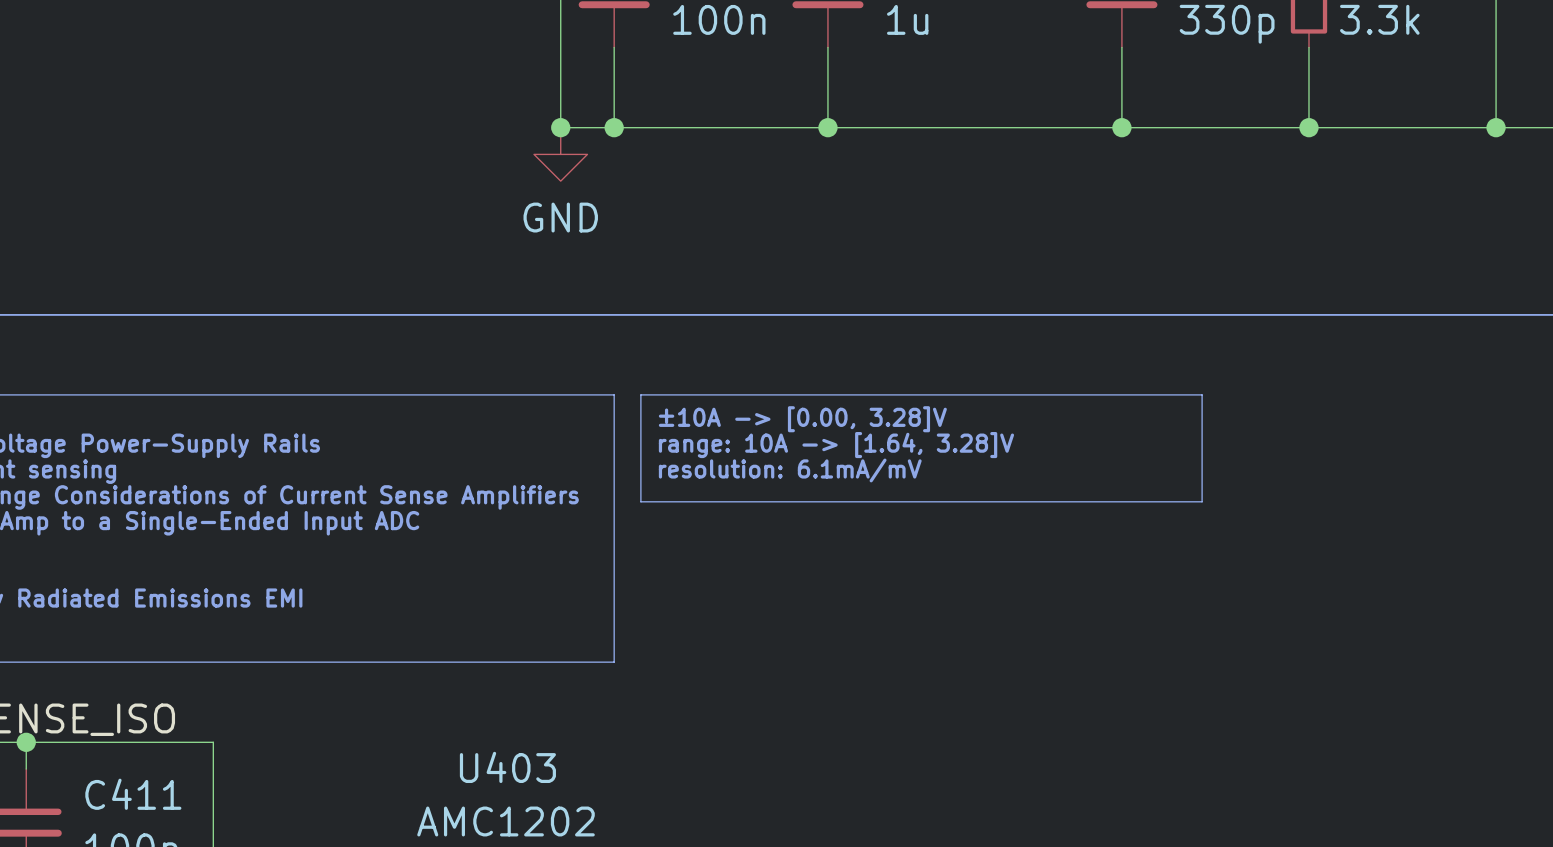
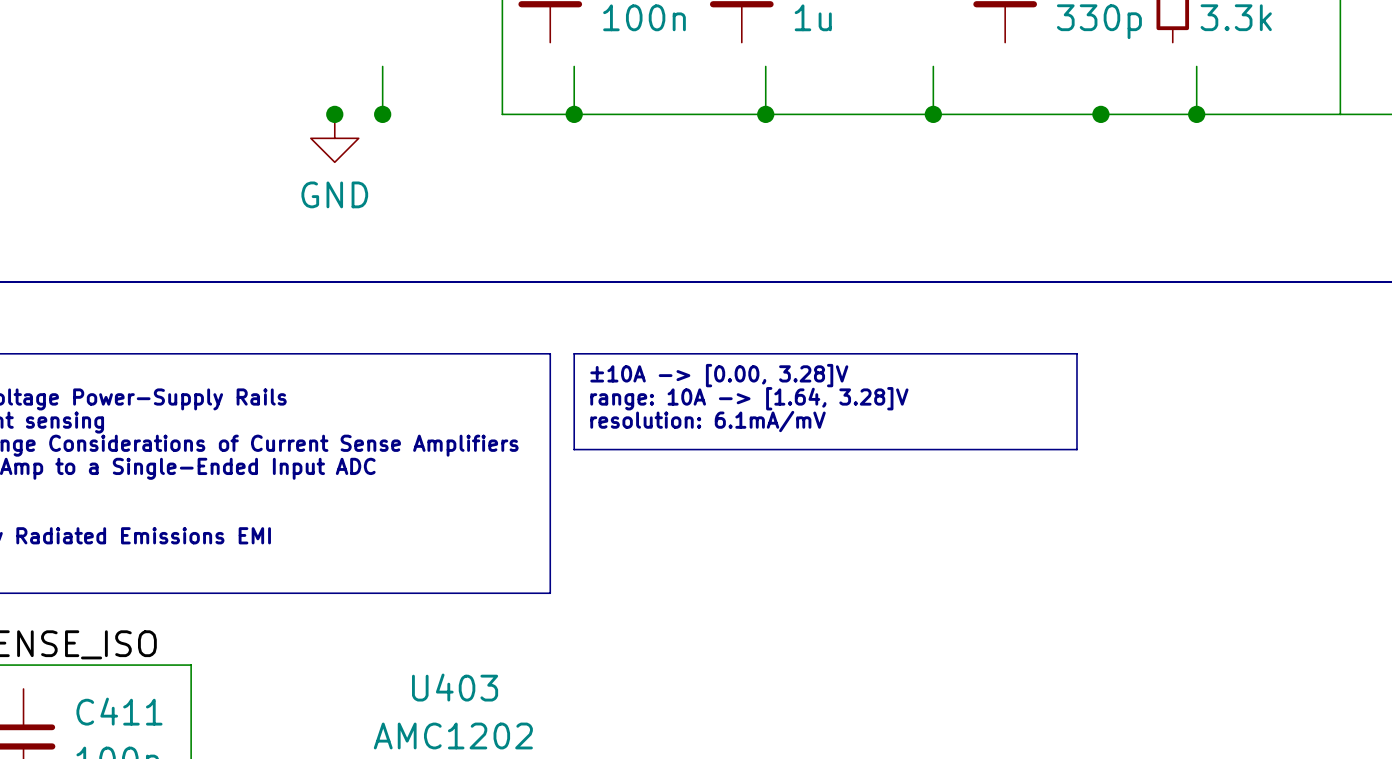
wire: (614, 47) (614, 127) -> none
wire: (827, 47) (827, 127) -> none
wire: (1121, 47) (1121, 127) -> none
wire: (1308, 47) (1308, 127) -> none
wire: none -> (382, 66) (382, 114)
wire: none -> (574, 66) (574, 114)
wire: none -> (765, 66) (765, 114)
wire: none -> (933, 66) (933, 114)
wire: none -> (1196, 66) (1196, 114)
junction: none -> (334, 114)
junction: none -> (382, 114)
junction: (560, 127) -> none
junction position: (614, 127) -> (574, 114)
junction position: (827, 127) -> (765, 114)
junction: none -> (933, 114)
junction: (1121, 127) -> none
junction: none -> (1100, 114)
junction position: (1308, 127) -> (1196, 114)
junction: (1496, 127) -> none
power symbol position: GND (560, 154) -> GND (334, 138)
wire: (26, 742) (26, 769) -> none
junction: (26, 742) -> none

